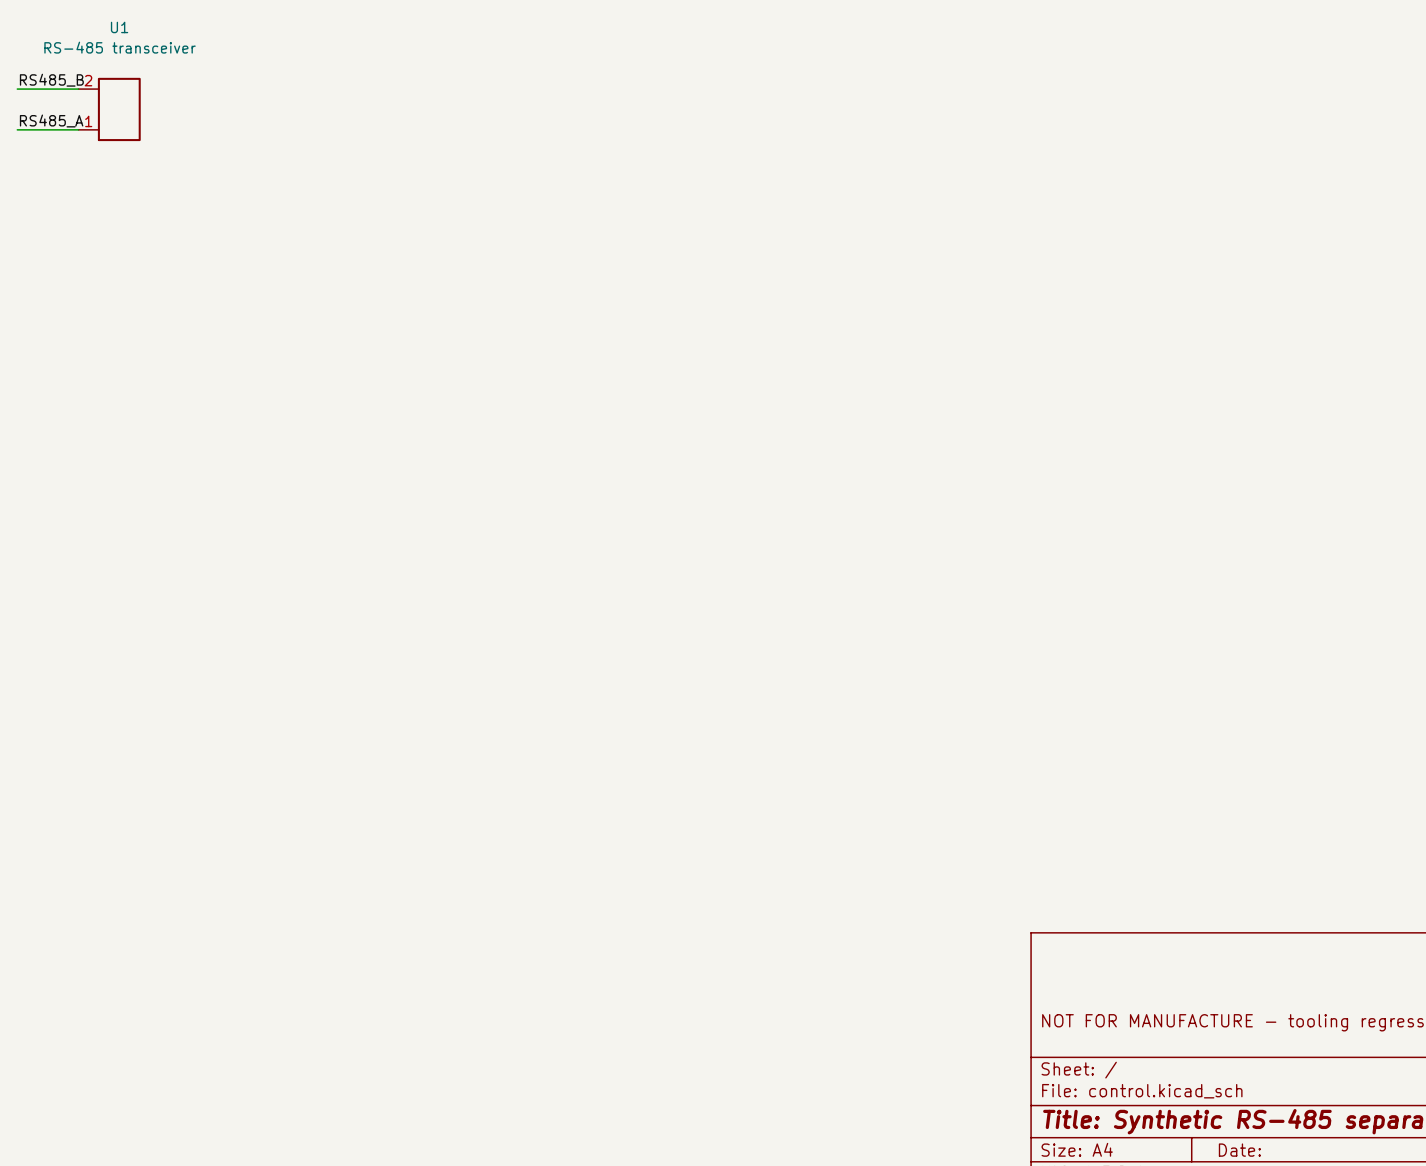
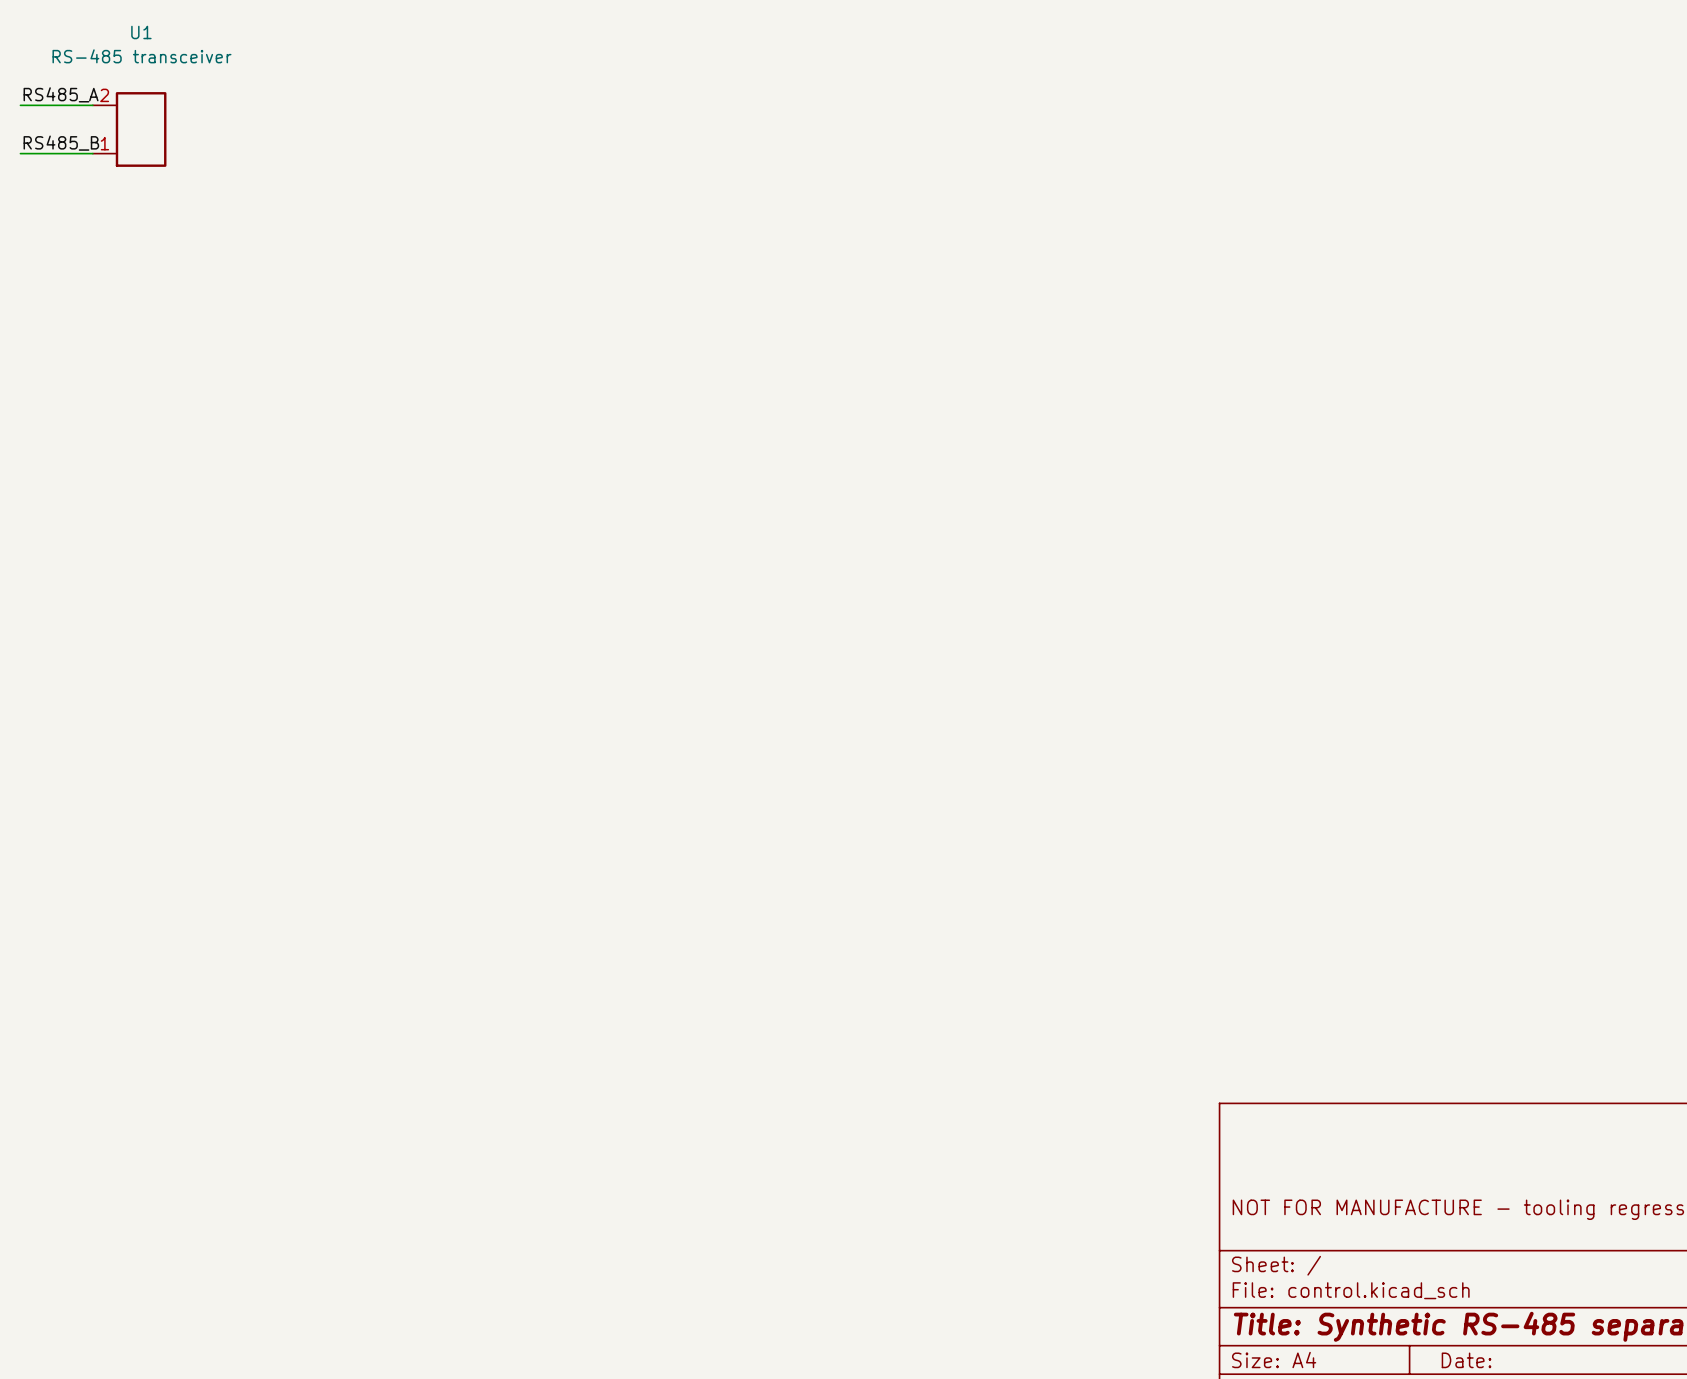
label: RS485_B (51, 80) -> RS485_A (61, 94)
label: RS485_A (51, 121) -> RS485_B (61, 143)

